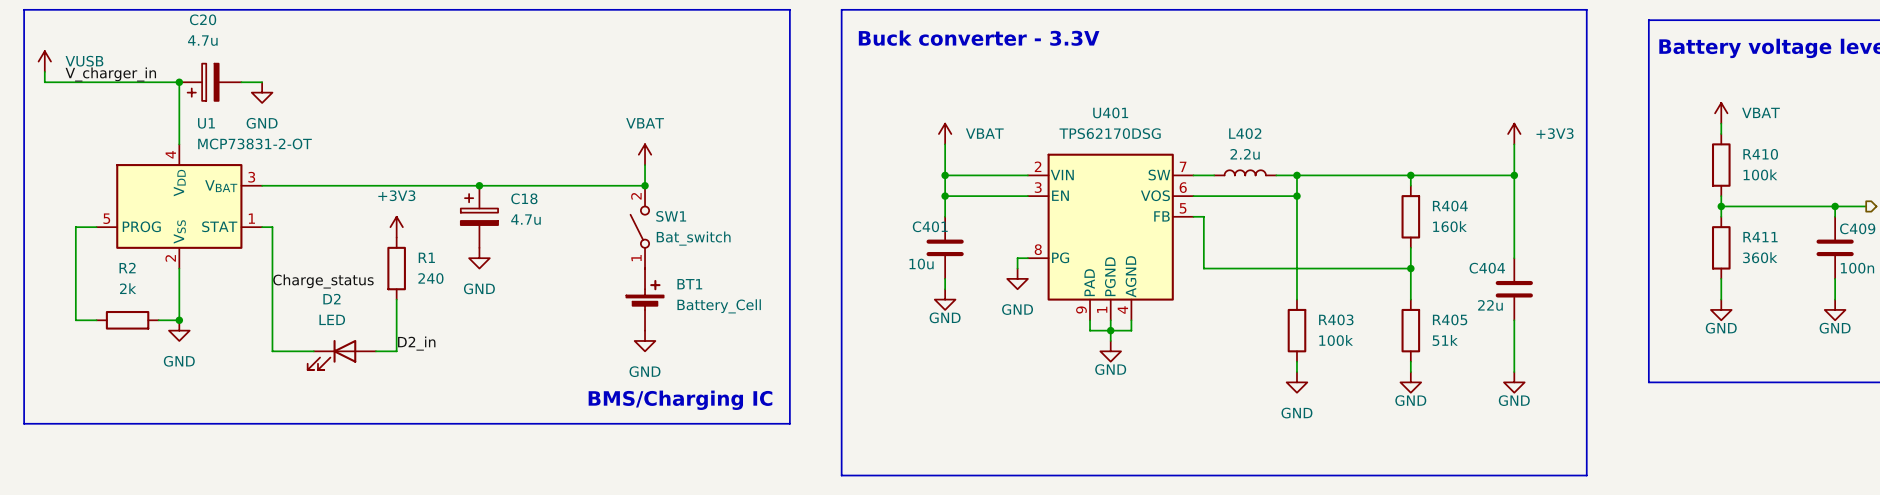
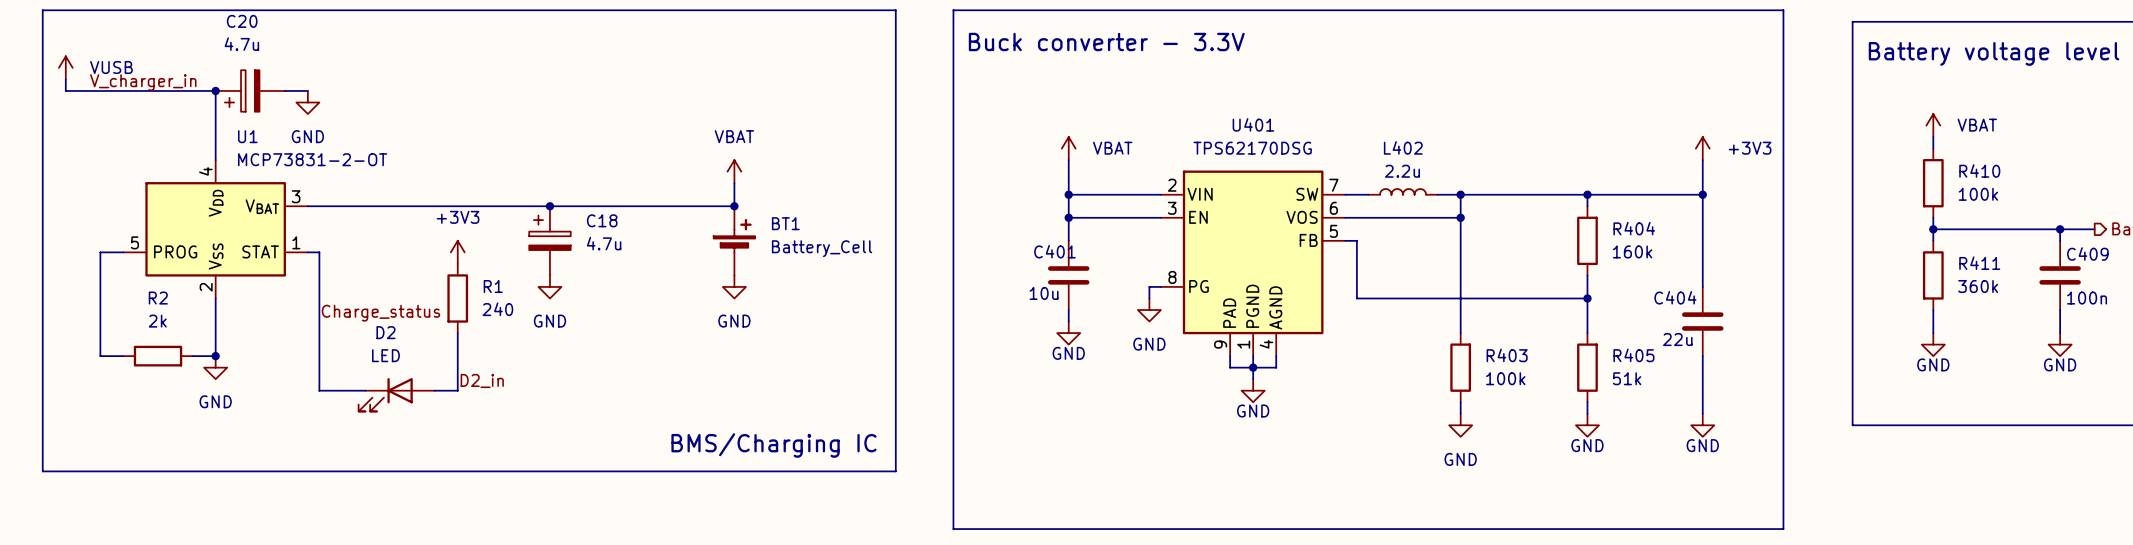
SW1: Bat_switch (639, 227) -> none
BT1 position: (645, 299) -> (734, 240)
power symbol position: GND (645, 340) -> GND (734, 286)

